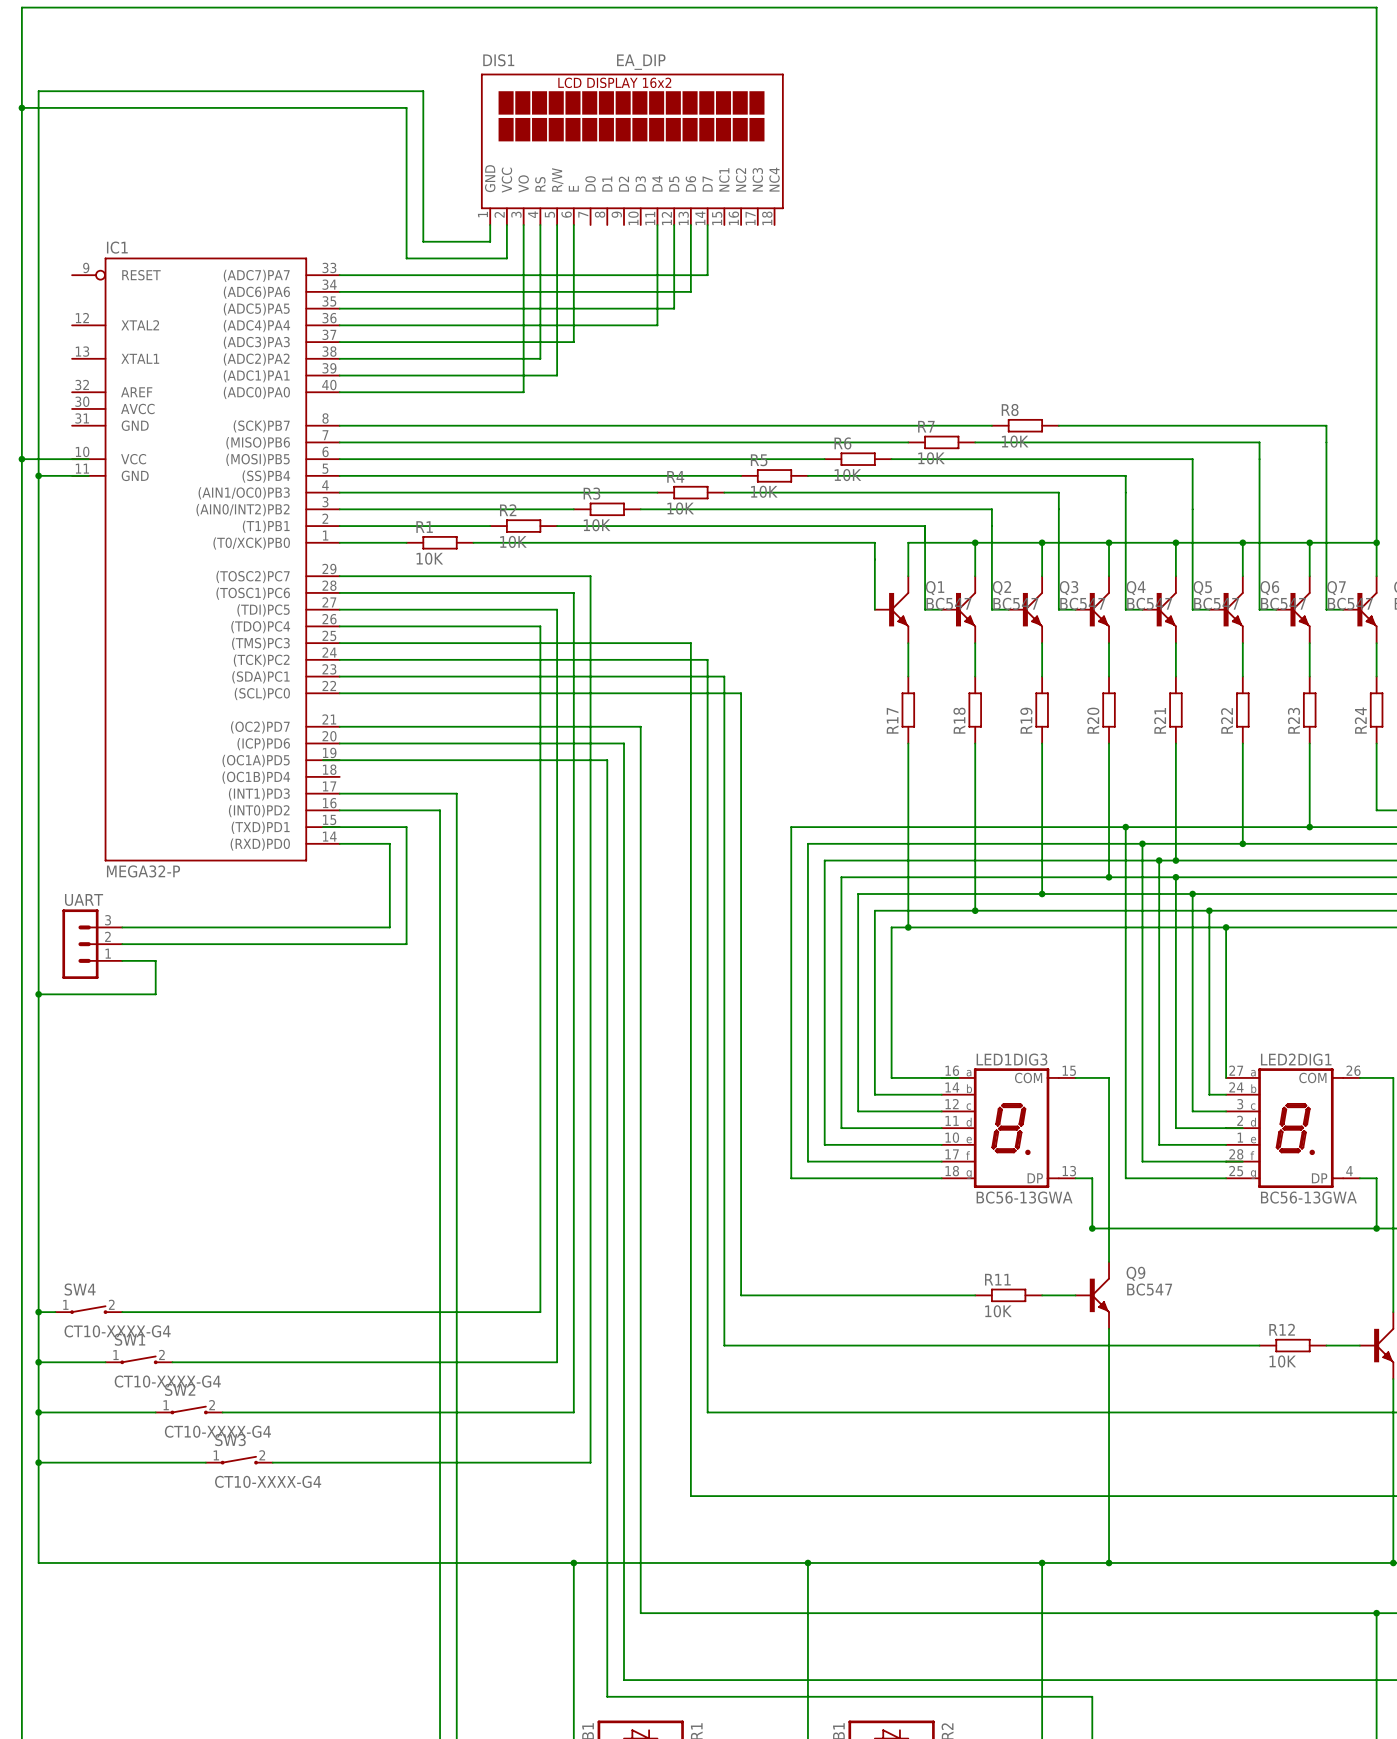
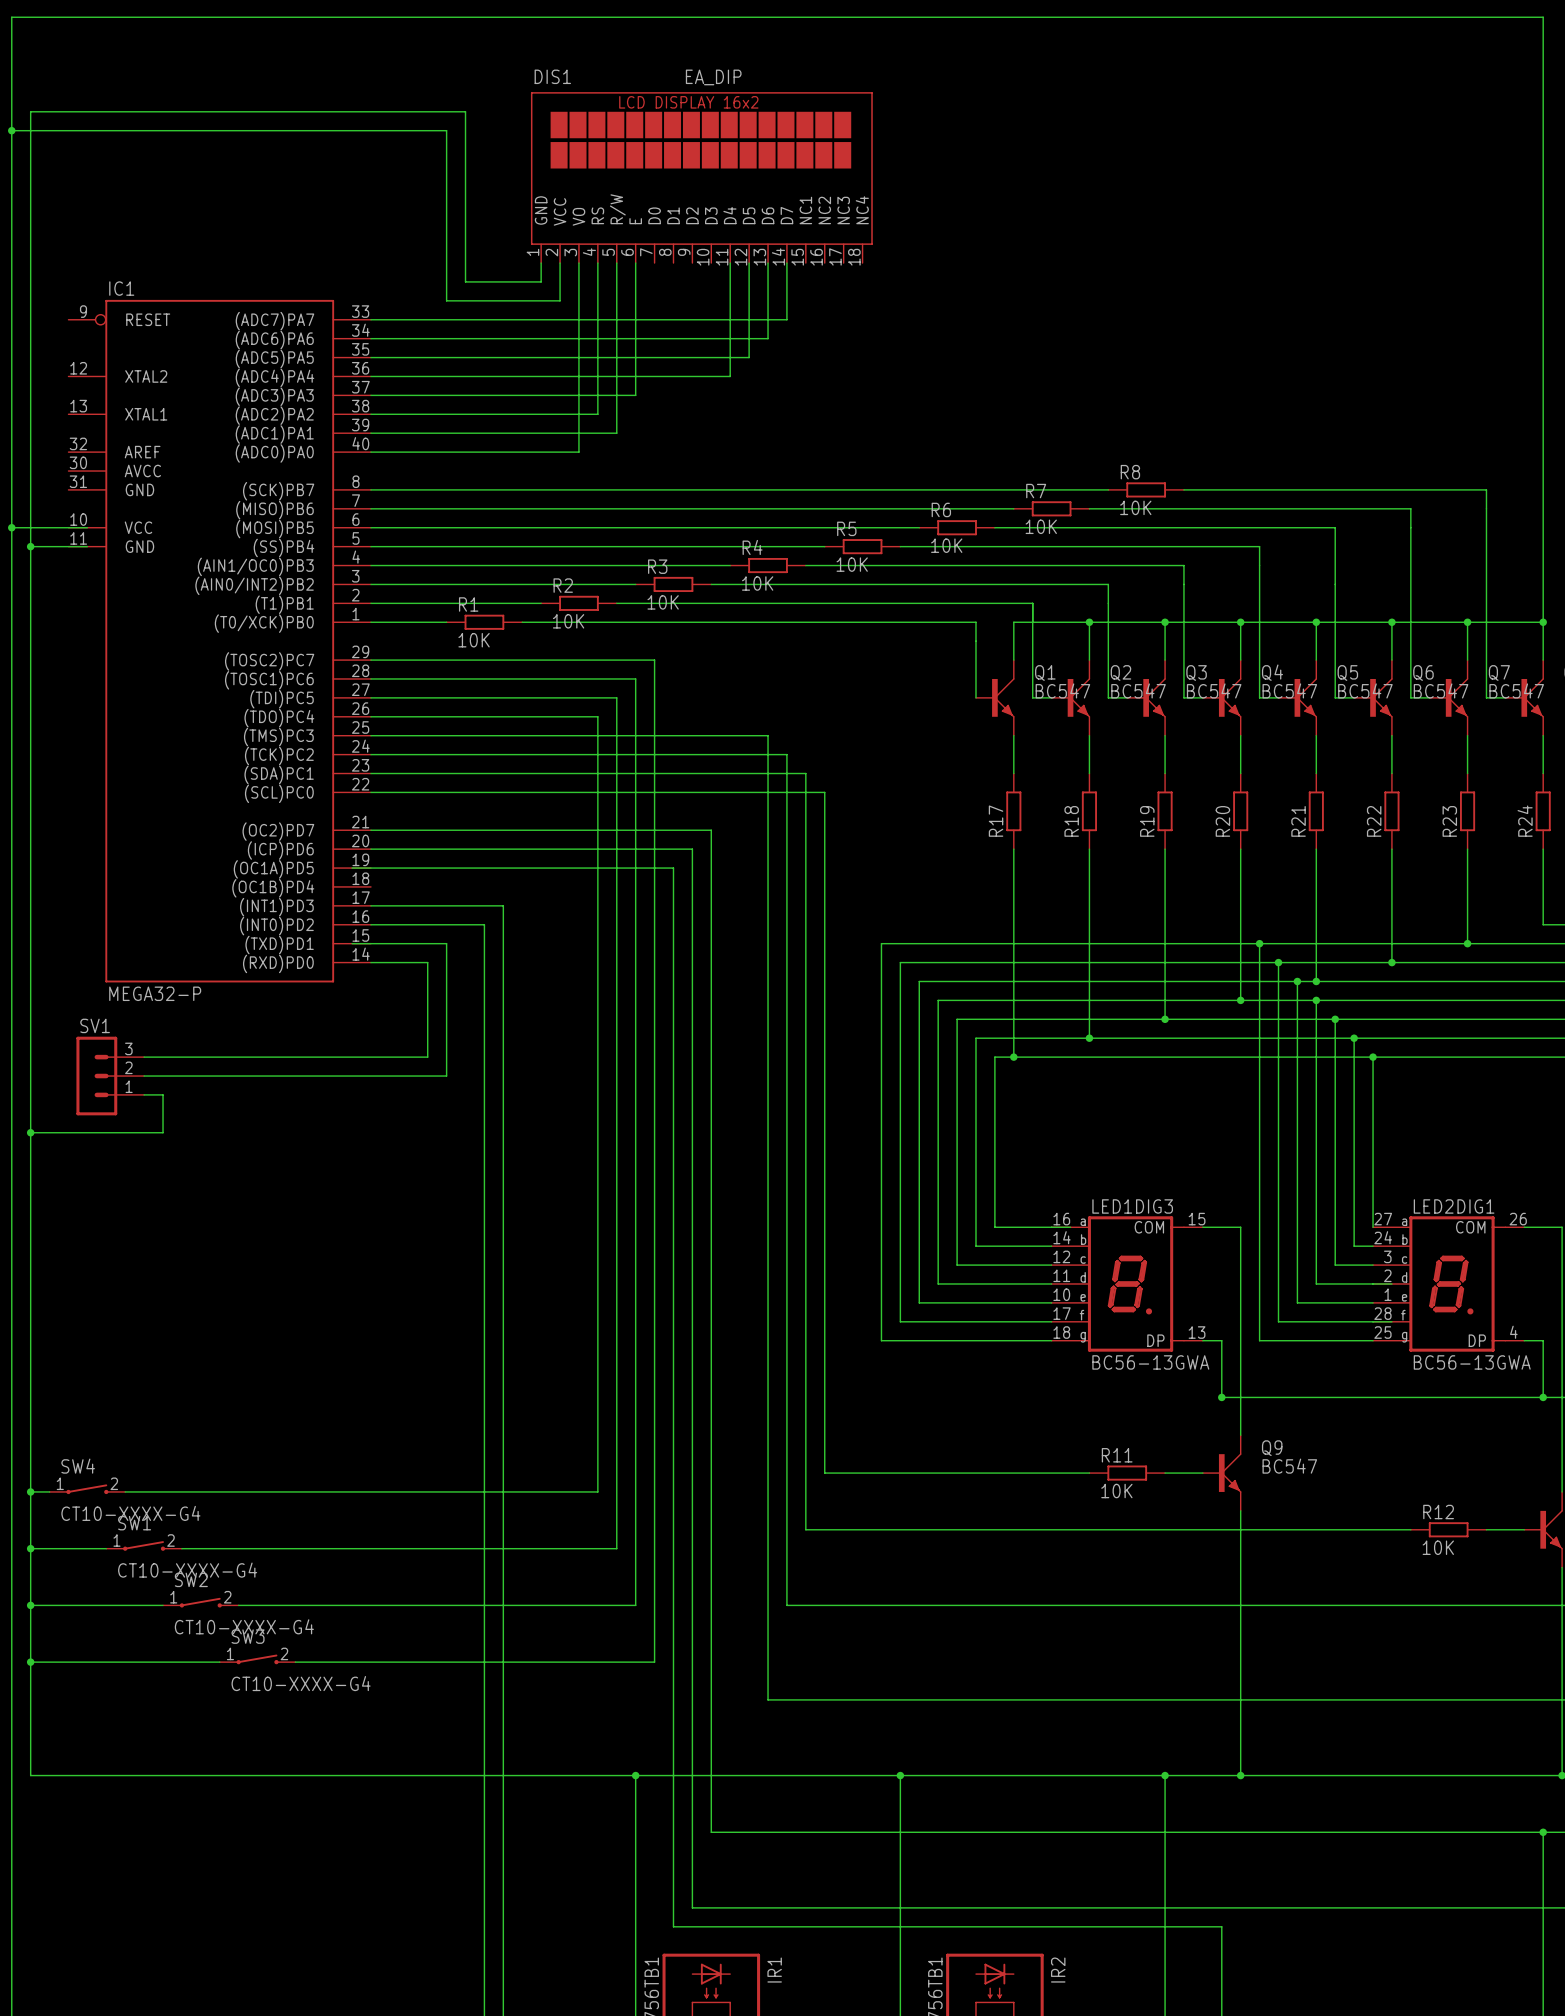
UART: (92, 944) -> none
SV1: none -> (110, 1076)

